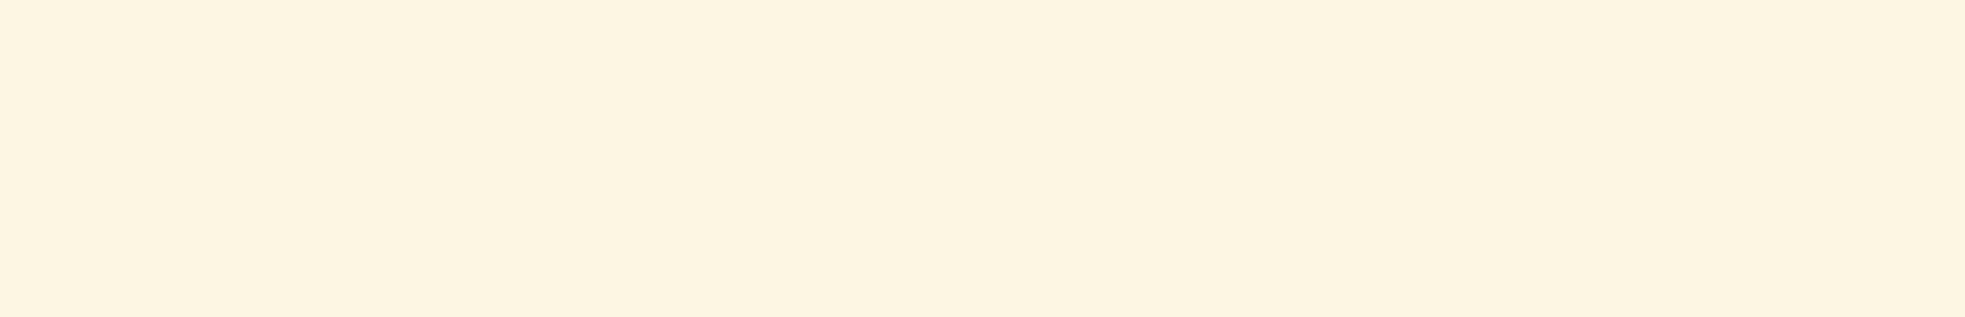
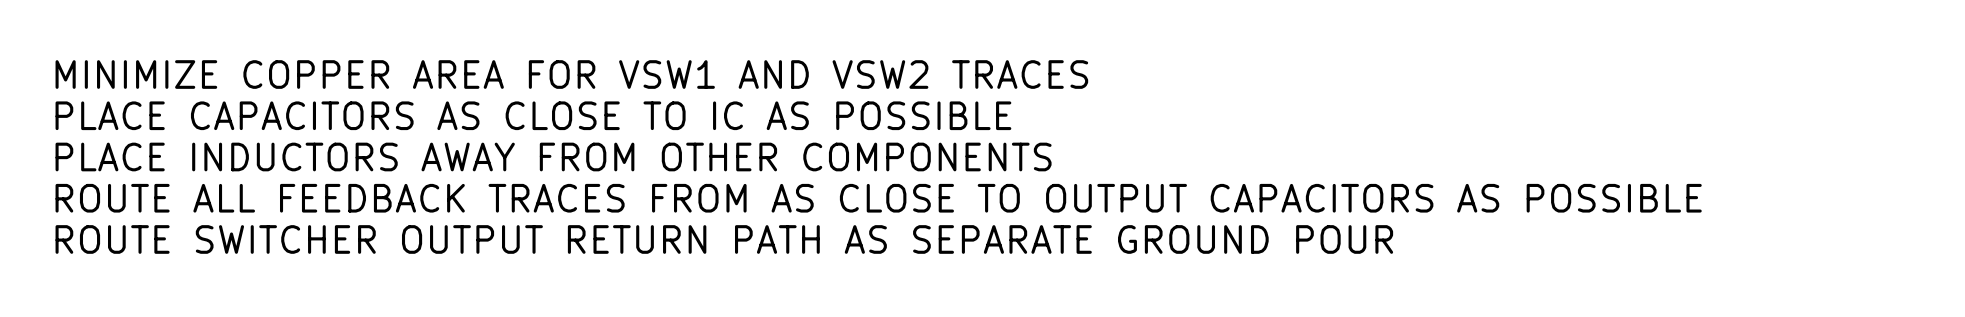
text: none -> MINIMIZE COPPER AREA FOR VSW1 AND VSW2 TRACES (571, 74)
text: none -> PLACE CAPACITORS AS CLOSE TO IC AS POSSIBLE (533, 115)
text: none -> PLACE INDUCTORS AWAY FROM OTHER COMPONENTS (553, 156)
text: none -> ROUTE ALL FEEDBACK TRACES FROM AS CLOSE TO OUTPUT CAPACITORS AS POSSIBLE (878, 198)
text: none -> ROUTE SWITCHER OUTPUT RETURN PATH AS SEPARATE GROUND POUR (724, 239)

